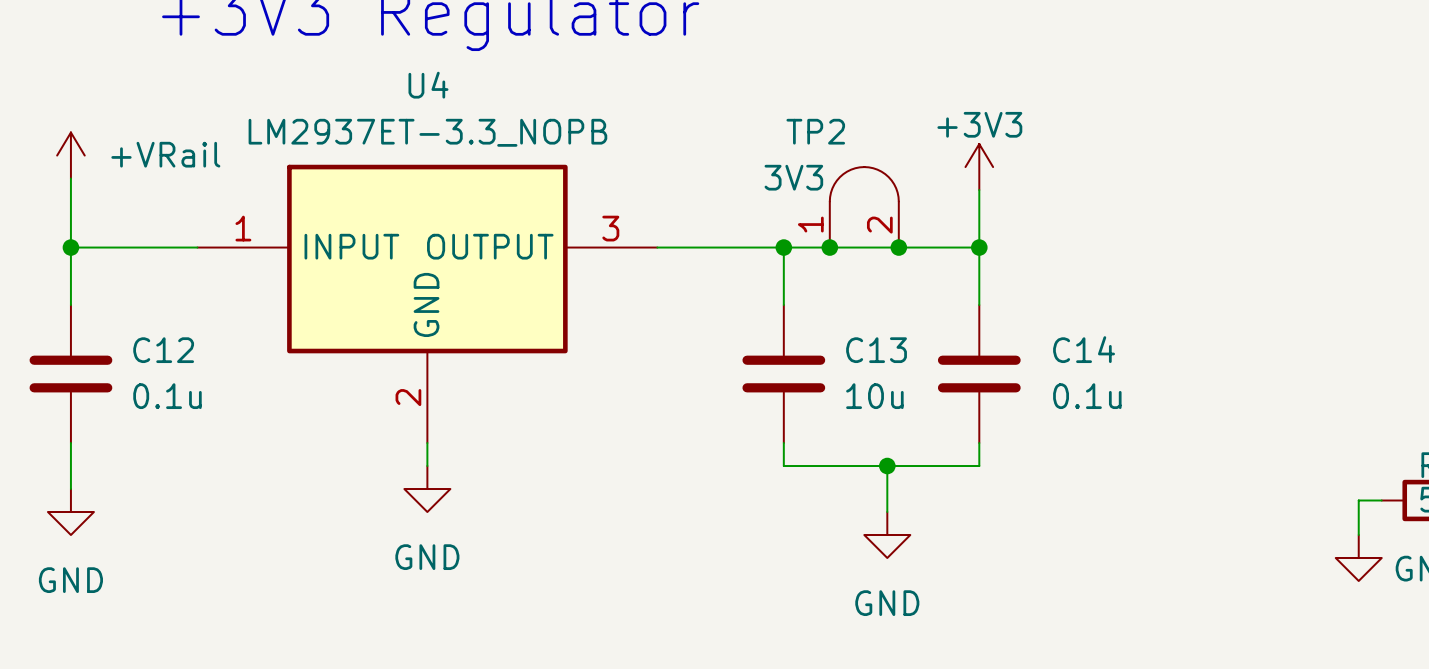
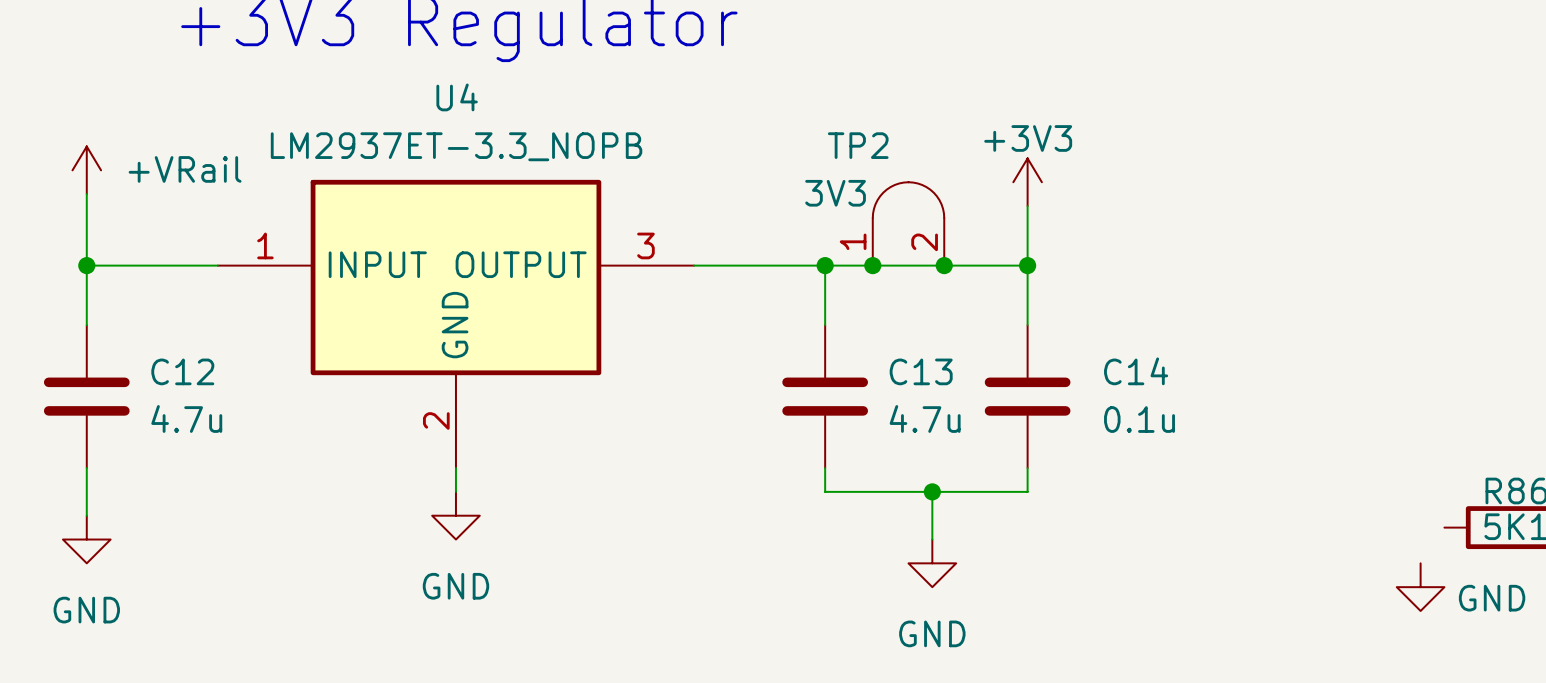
C12 value: 0.1u (167, 396) -> 4.7u (186, 418)
C13 value: 10u (874, 396) -> 4.7u (925, 418)
wire: (1381, 500) (1358, 500) (1358, 534) -> none

